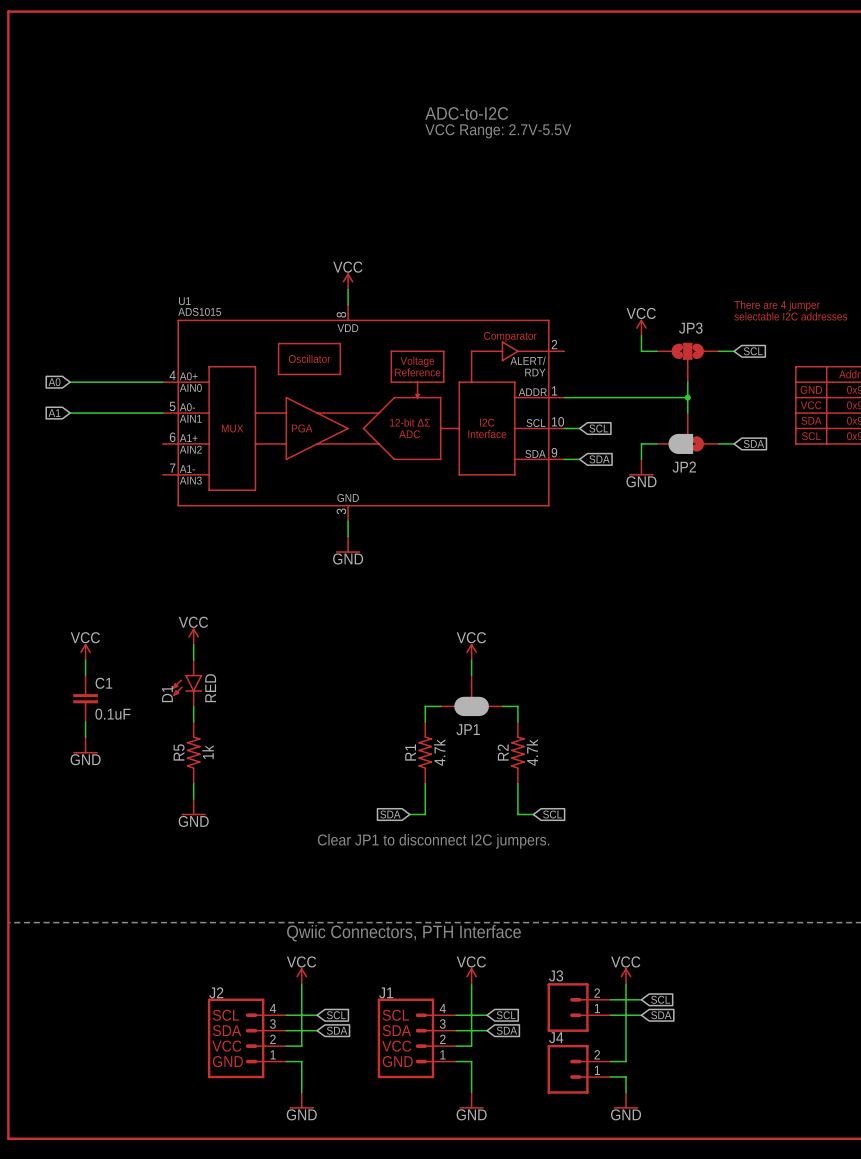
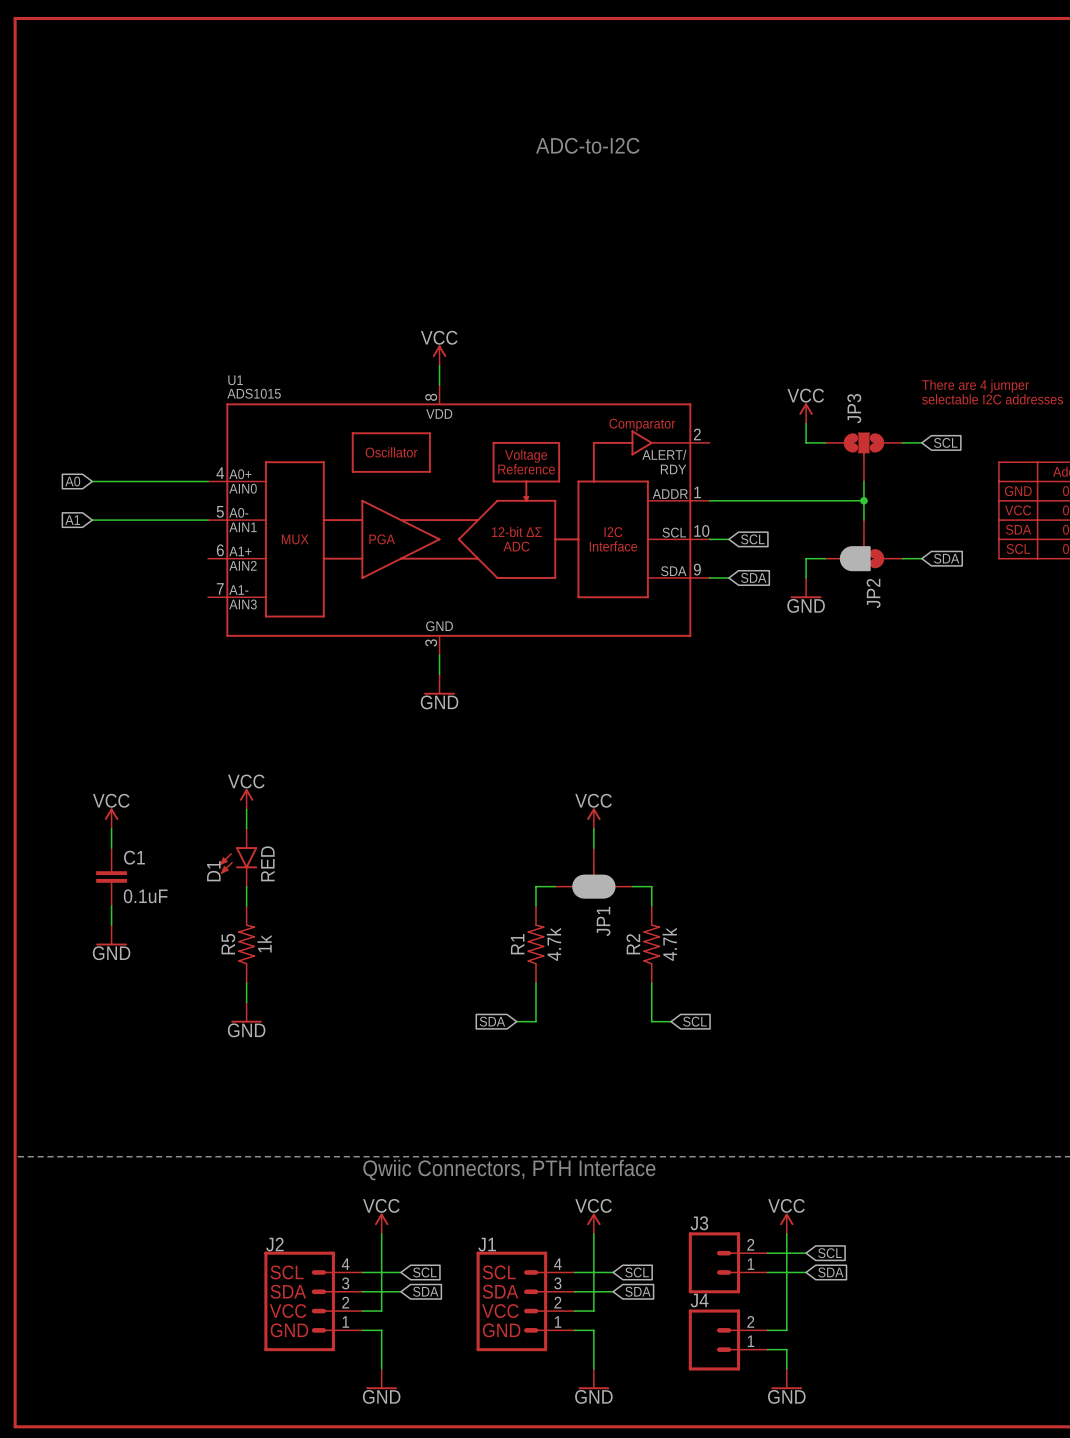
text: VCC Range: 2.7V-5.5V (498, 131) -> none
JP3 name rotation: 0° (690, 328) -> 90° counterclockwise (854, 408)
JP2 name rotation: 0° (684, 467) -> 90° counterclockwise (873, 593)
JP1 name rotation: 0° (468, 729) -> 90° counterclockwise (603, 921)
text: Clear JP1 to disconnect I2C jumpers. (433, 841) -> none

